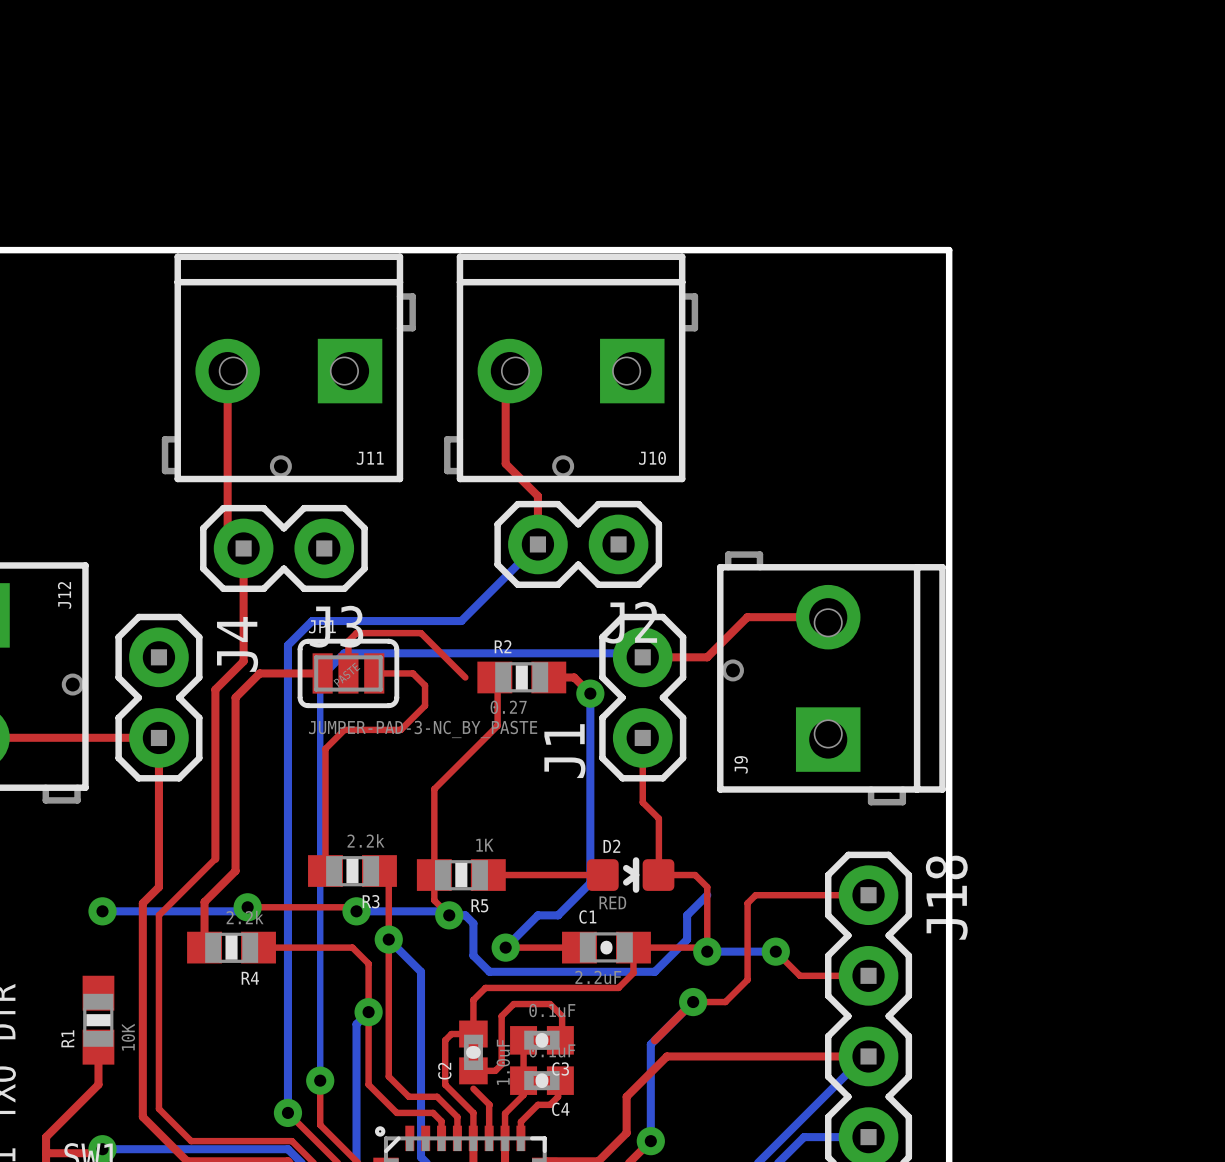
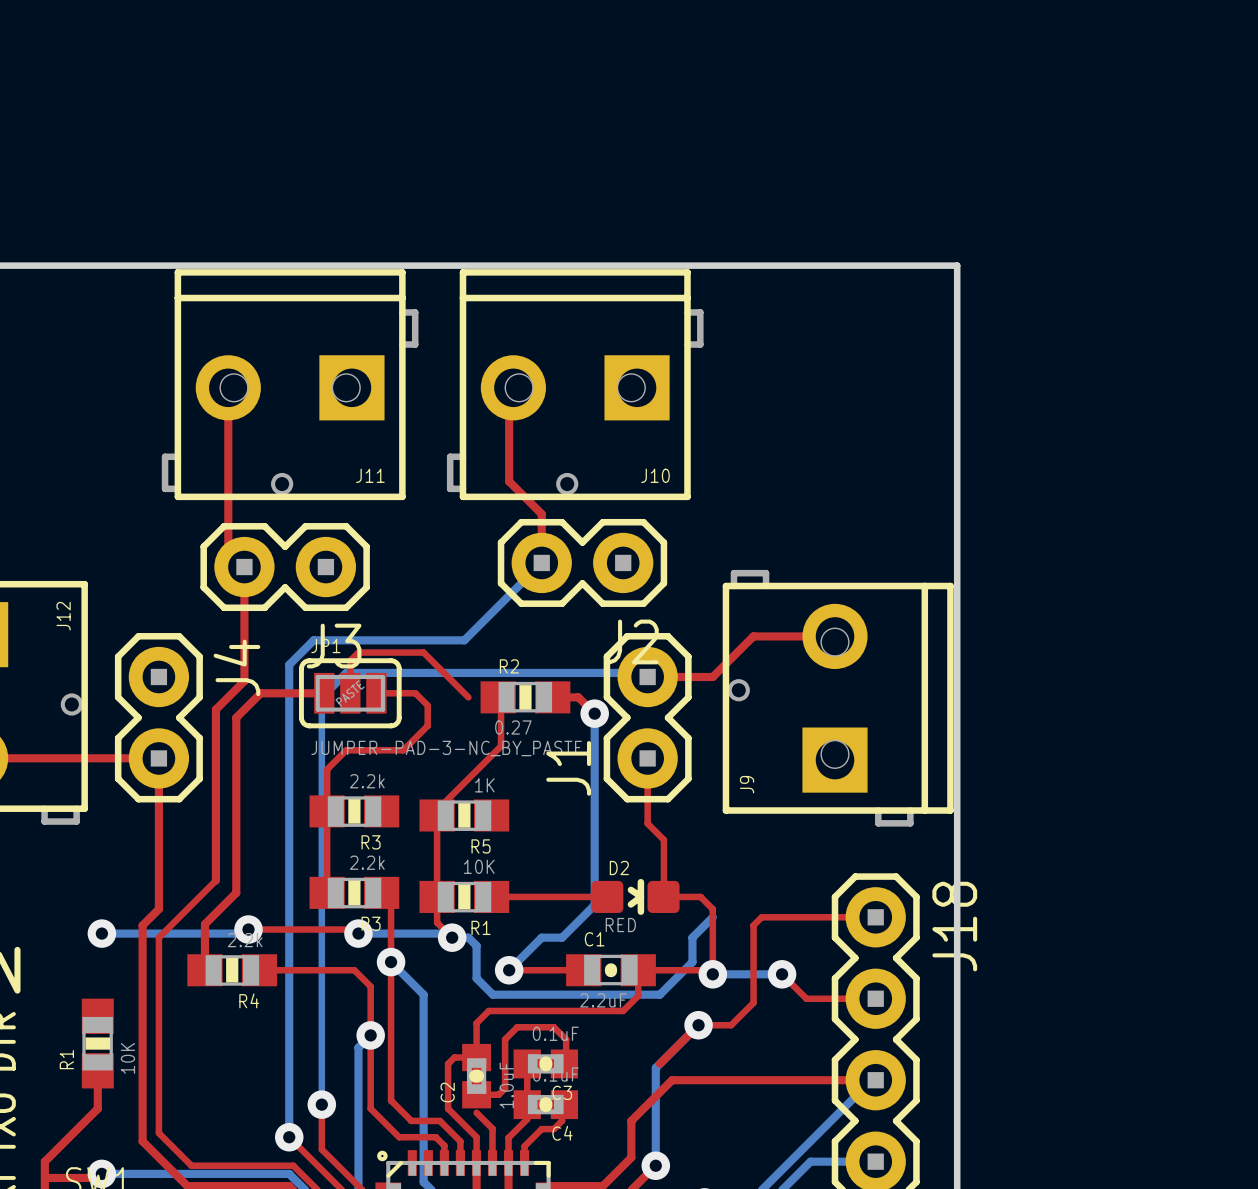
R3: none -> 2.2k (354, 811)
R5: none -> 1K (464, 815)
R5 value: 1K (484, 845) -> 10K (479, 866)
R5 name: R5 (479, 905) -> R1 (481, 927)

